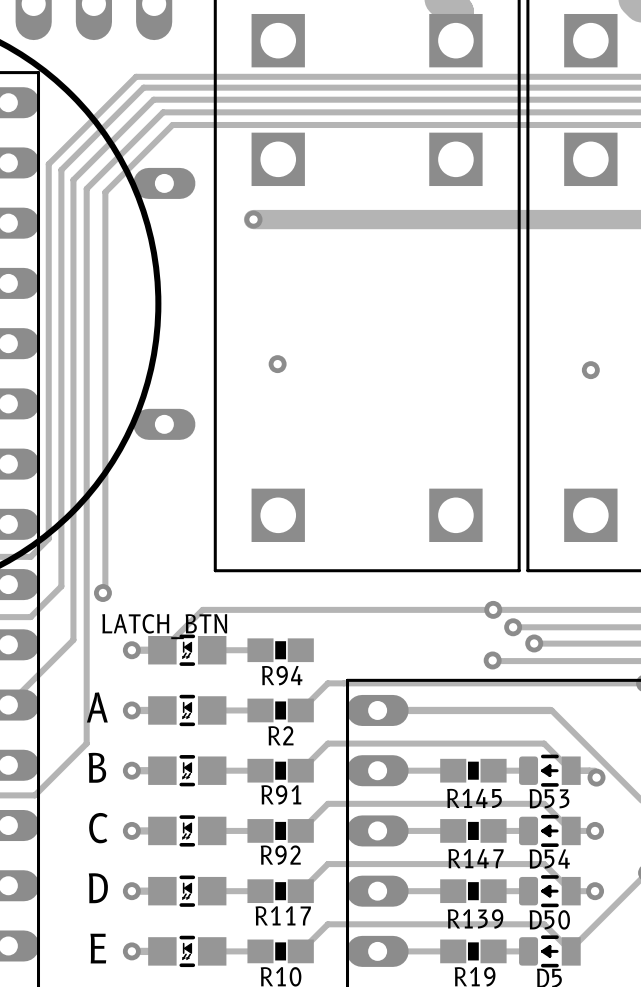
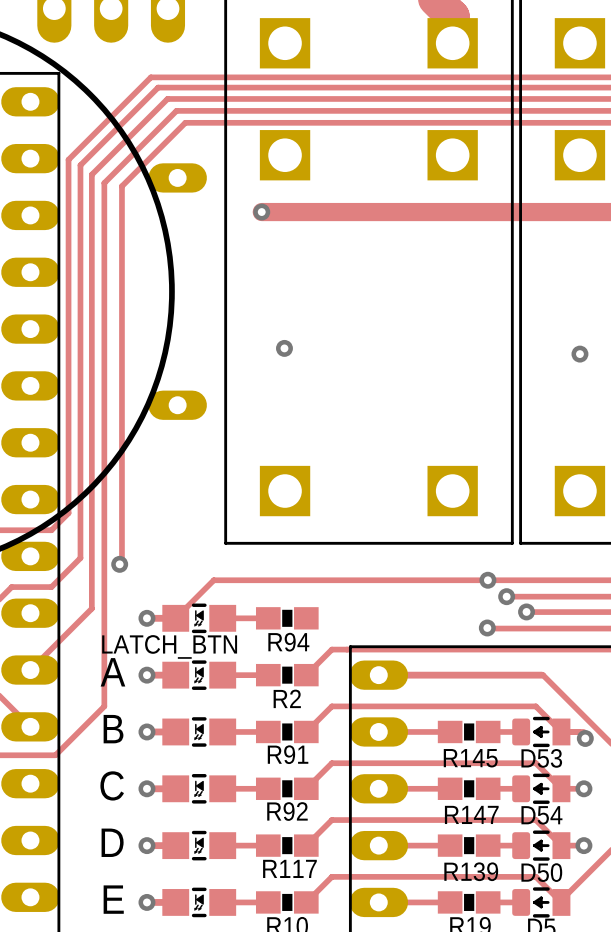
LATCH_BTN name position: LATCH_BTN (164, 626) -> LATCH_BTN (169, 646)

